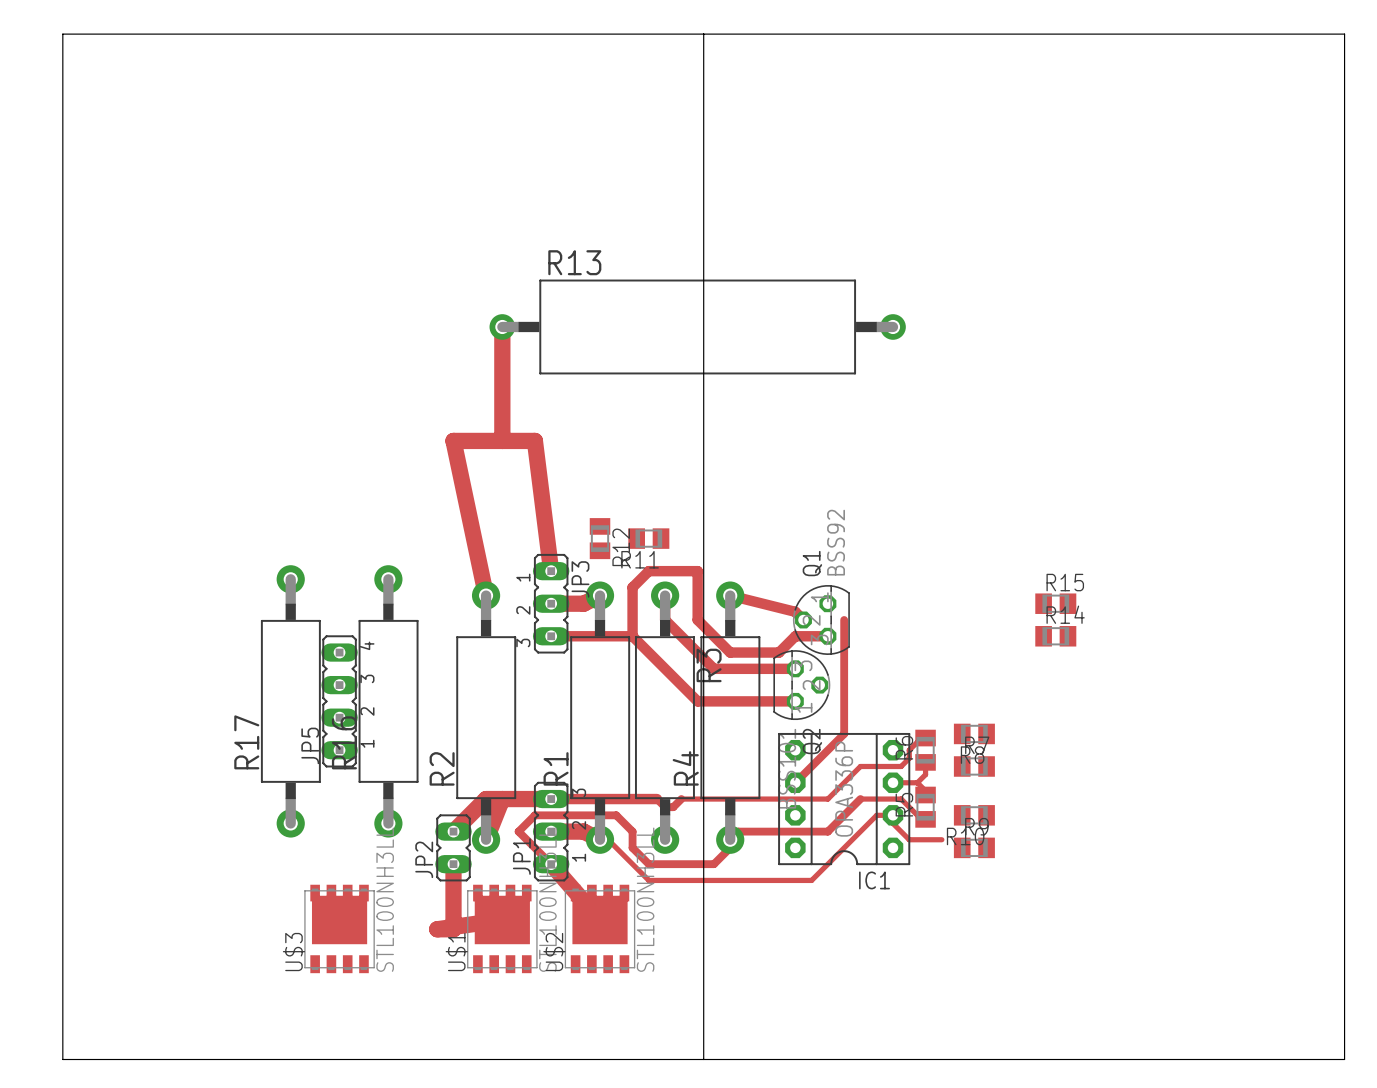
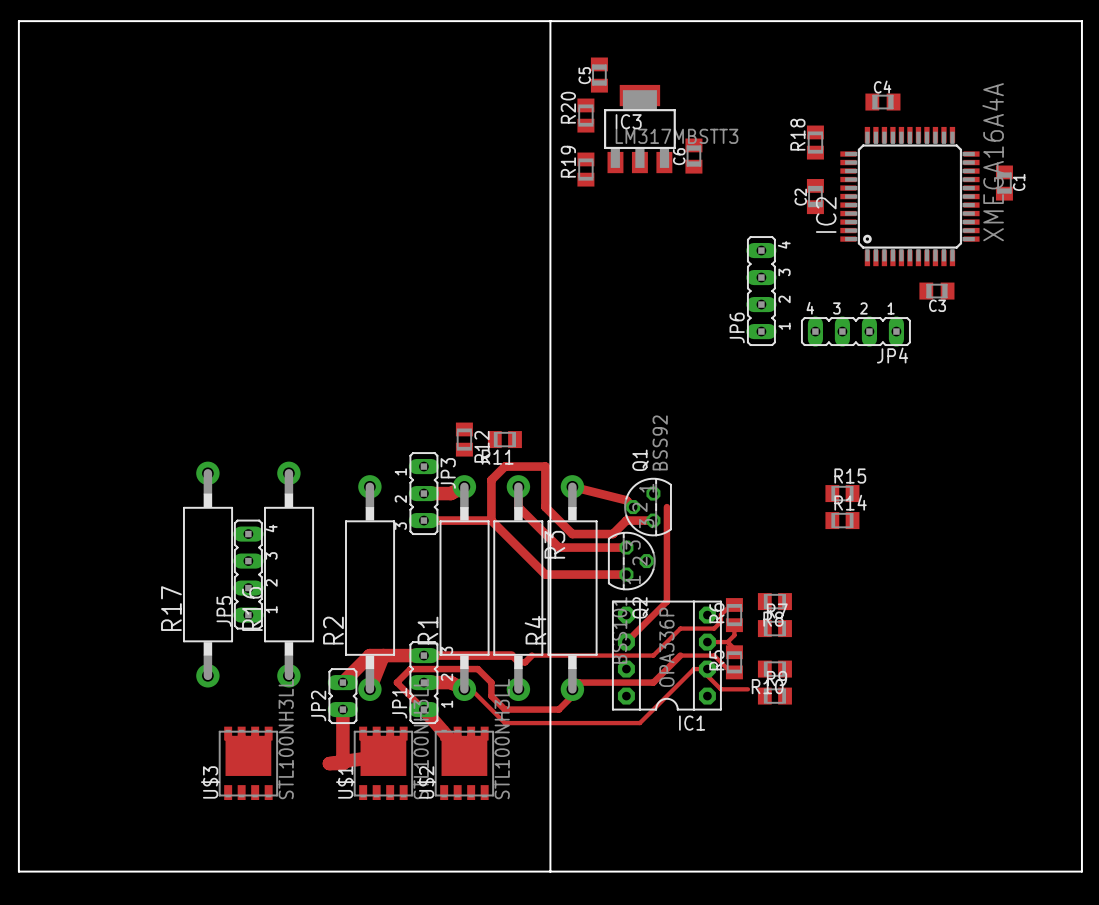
C5: none -> (599, 75)
C4: none -> (882, 102)
R20: none -> (585, 115)
IC3: none -> LM317MBSTT3 (639, 129)
R18: none -> (815, 142)
C6: none -> (693, 156)
R19: none -> (585, 169)
C1: none -> (1004, 183)
C2: none -> (815, 196)
IC2: none -> XMEGA16A4A (909, 196)
track: (502, 326) (502, 440) -> none
R13: (697, 326) -> none
JP6: none -> (761, 291)
C3: none -> (936, 291)
JP4: none -> (855, 331)
track: (551, 571) (534, 440) (453, 440) (486, 595) -> none

